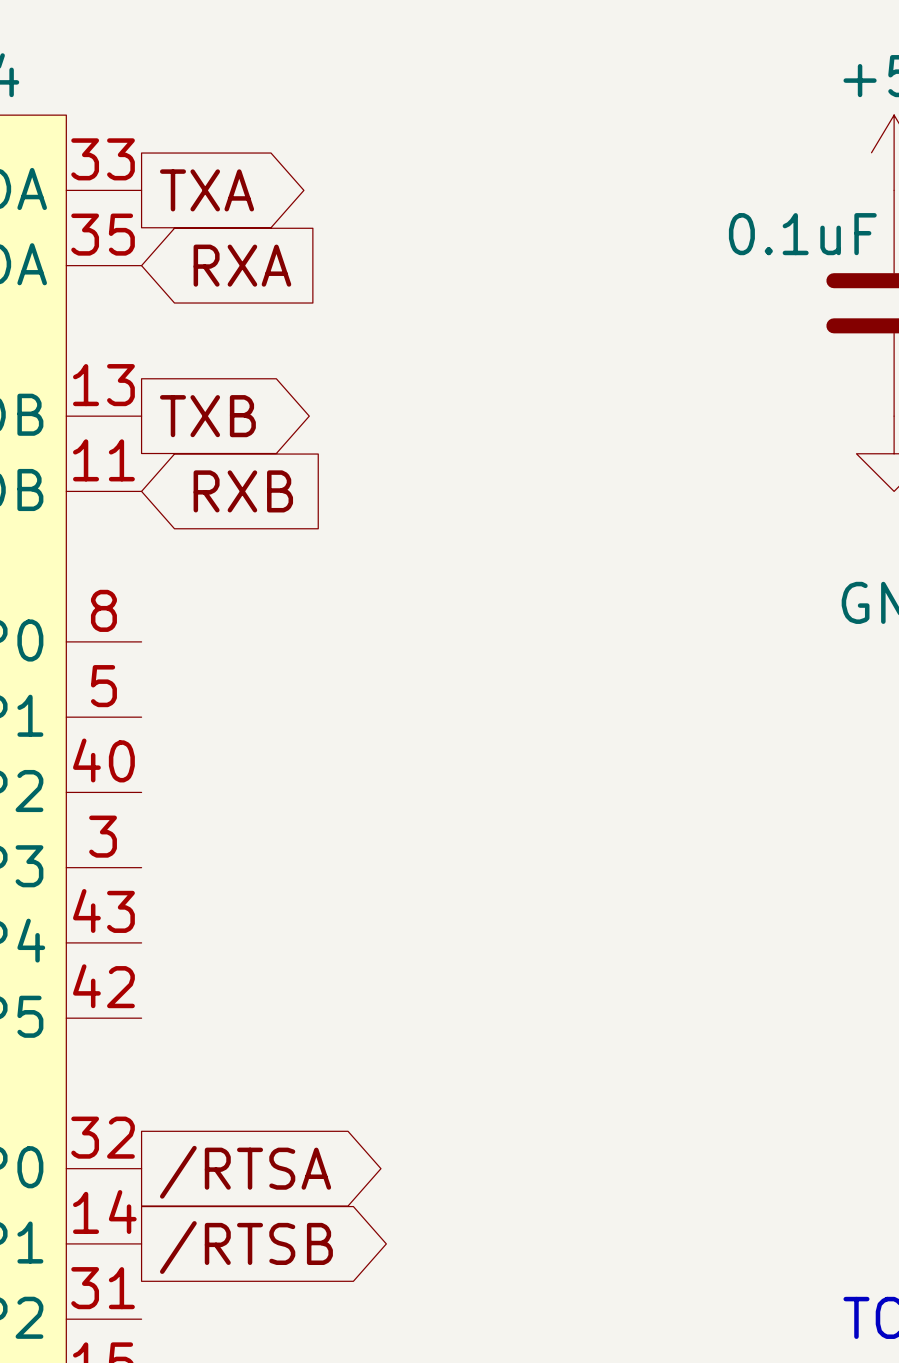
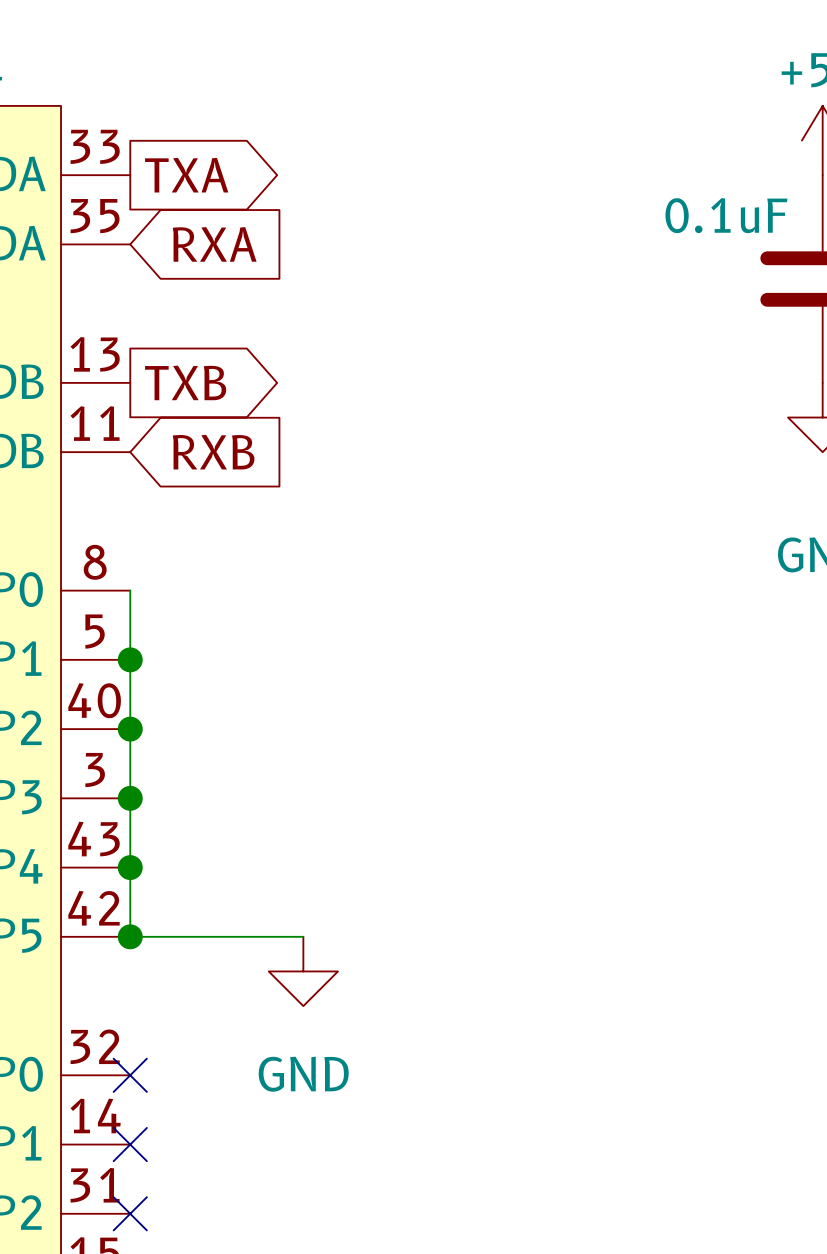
wire: none -> (130, 590) (130, 936) (303, 936)
junction: none -> (130, 659)
junction: none -> (130, 729)
junction: none -> (130, 798)
junction: none -> (130, 867)
junction: none -> (130, 936)
power symbol: none -> GND (303, 971)
no-connect mark: none -> (130, 1075)
global label: /RTSA (245, 1172) -> none
no-connect mark: none -> (130, 1144)
global label: /RTSB (246, 1247) -> none
no-connect mark: none -> (130, 1213)

